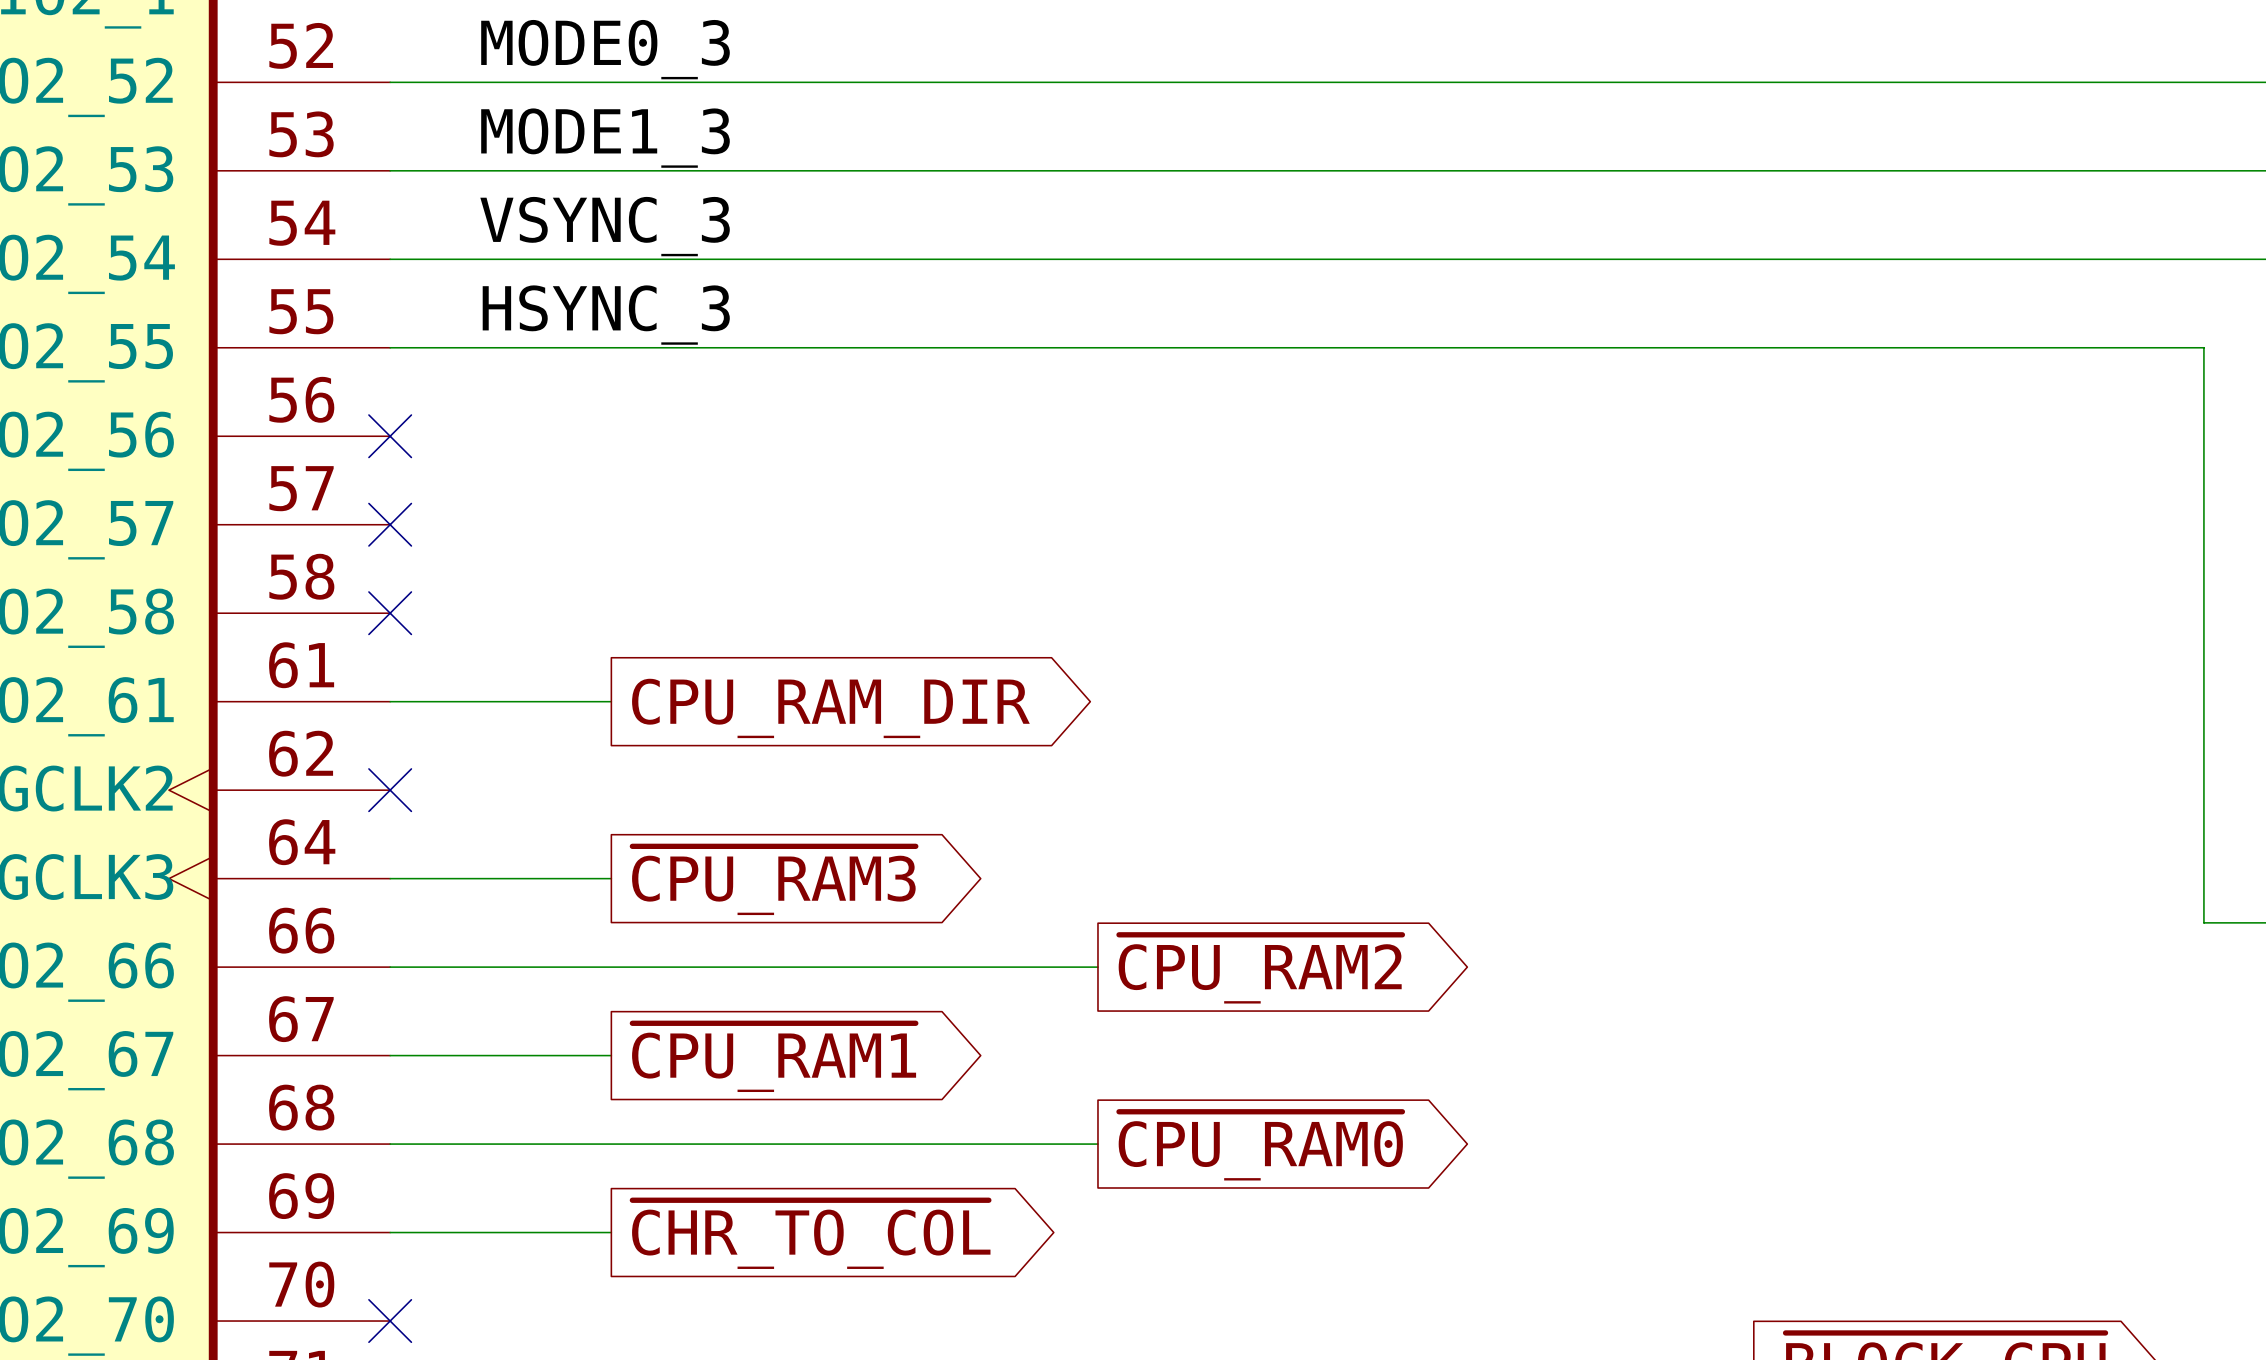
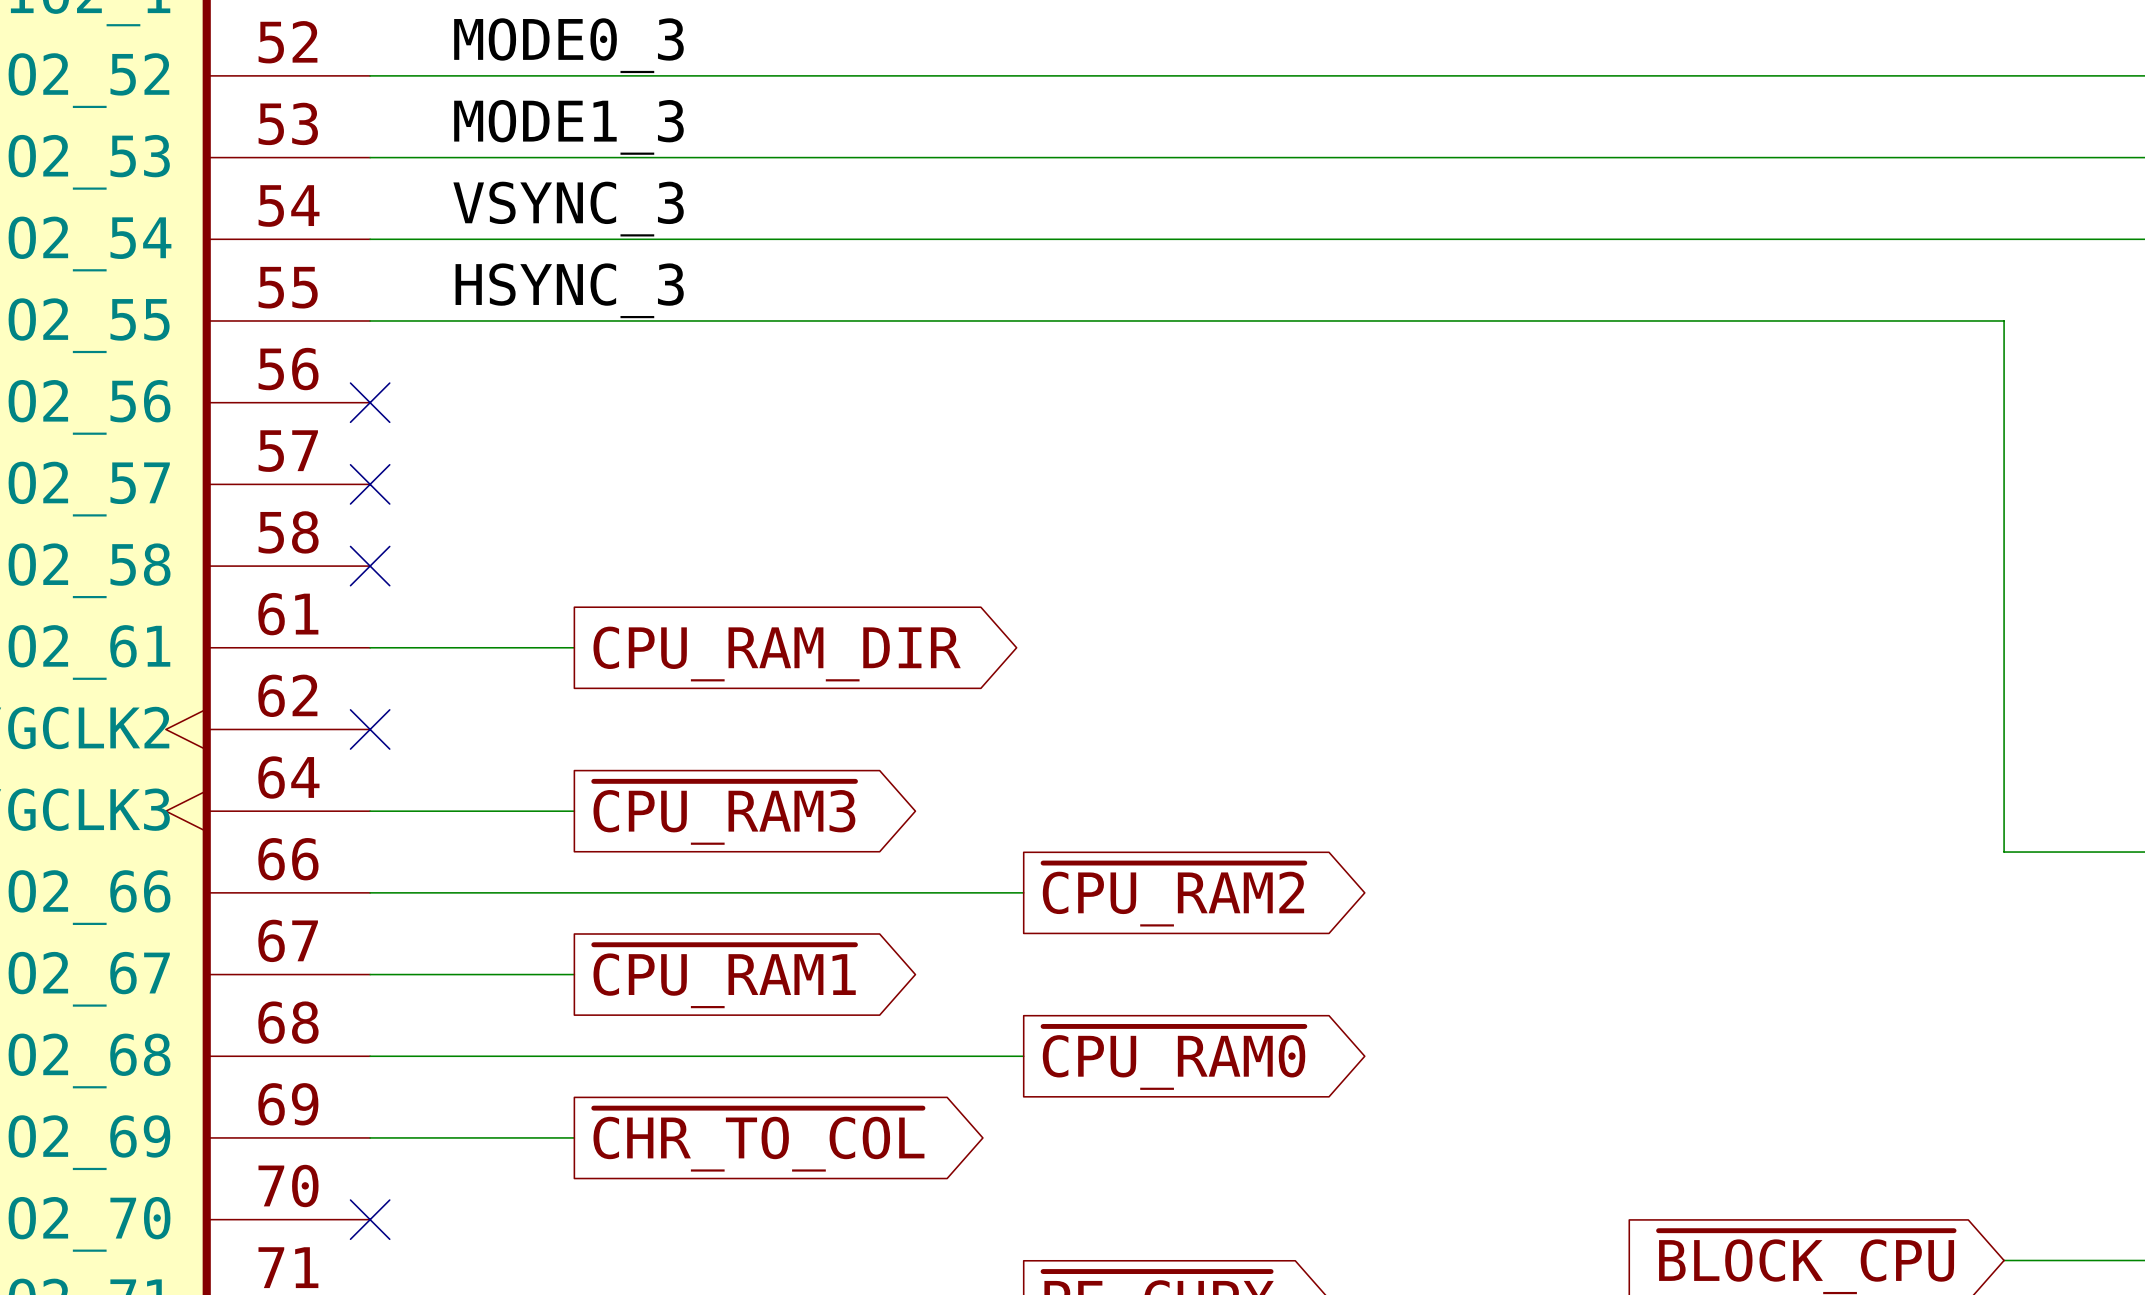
wire: (2159, 347) (2203, 347) (2203, 922) -> (2004, 320) (2004, 852) (2044, 852)

